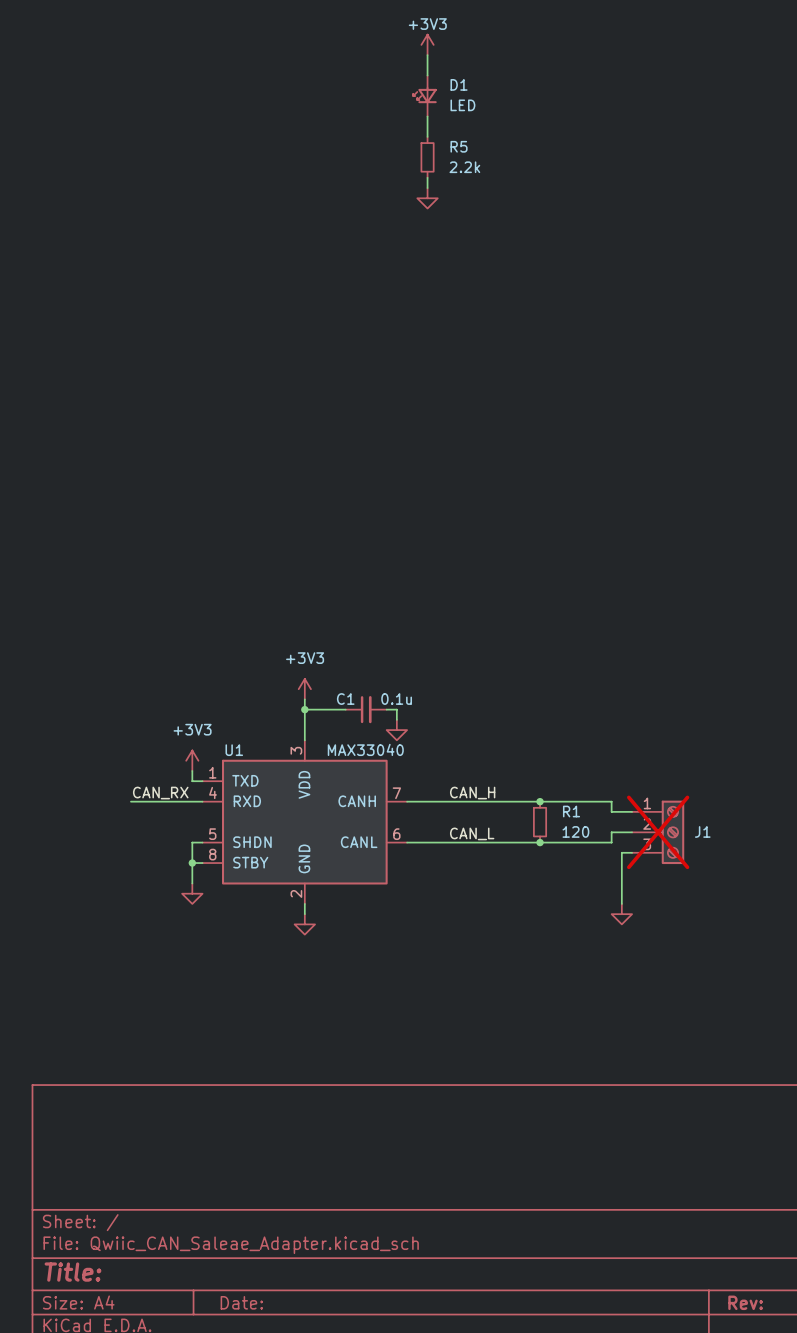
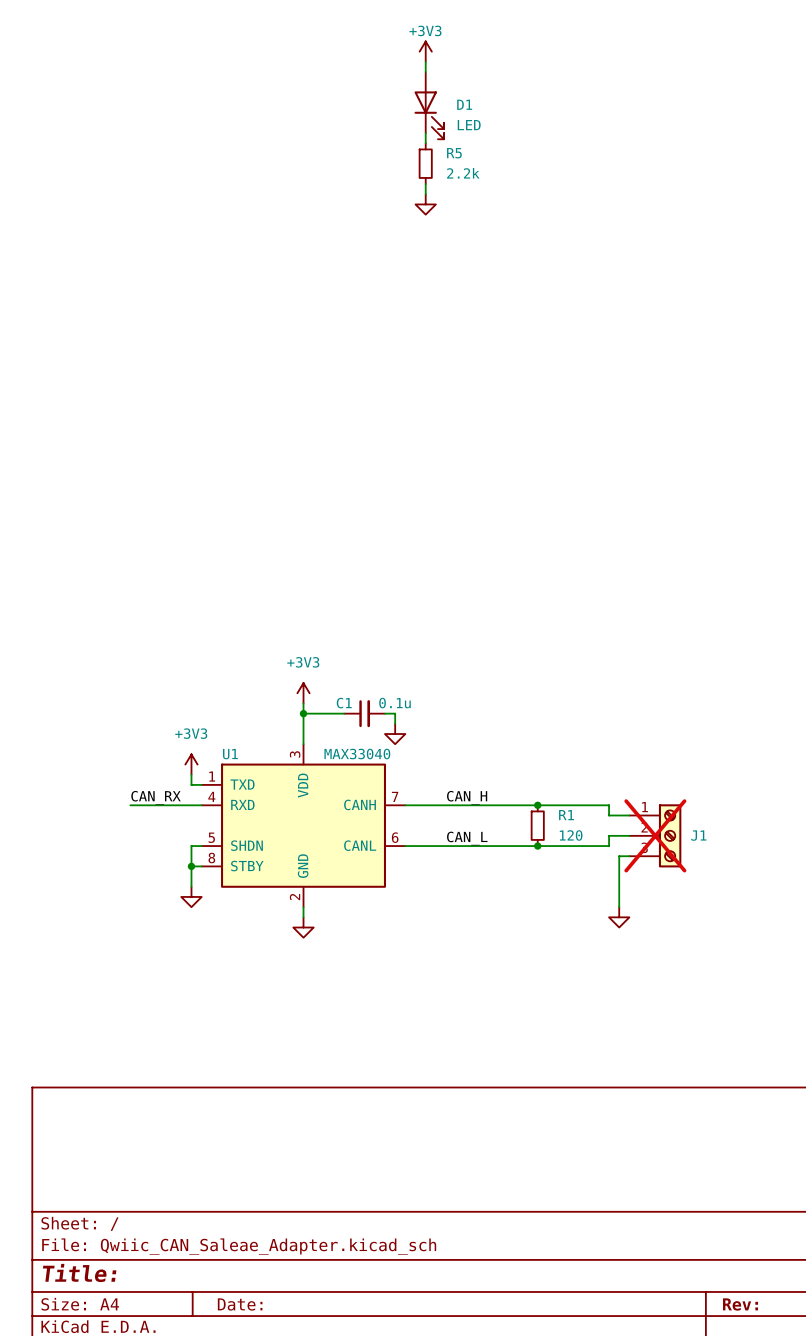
D1 symbol: [413, 75, 437, 117] -> [414, 72, 445, 140]

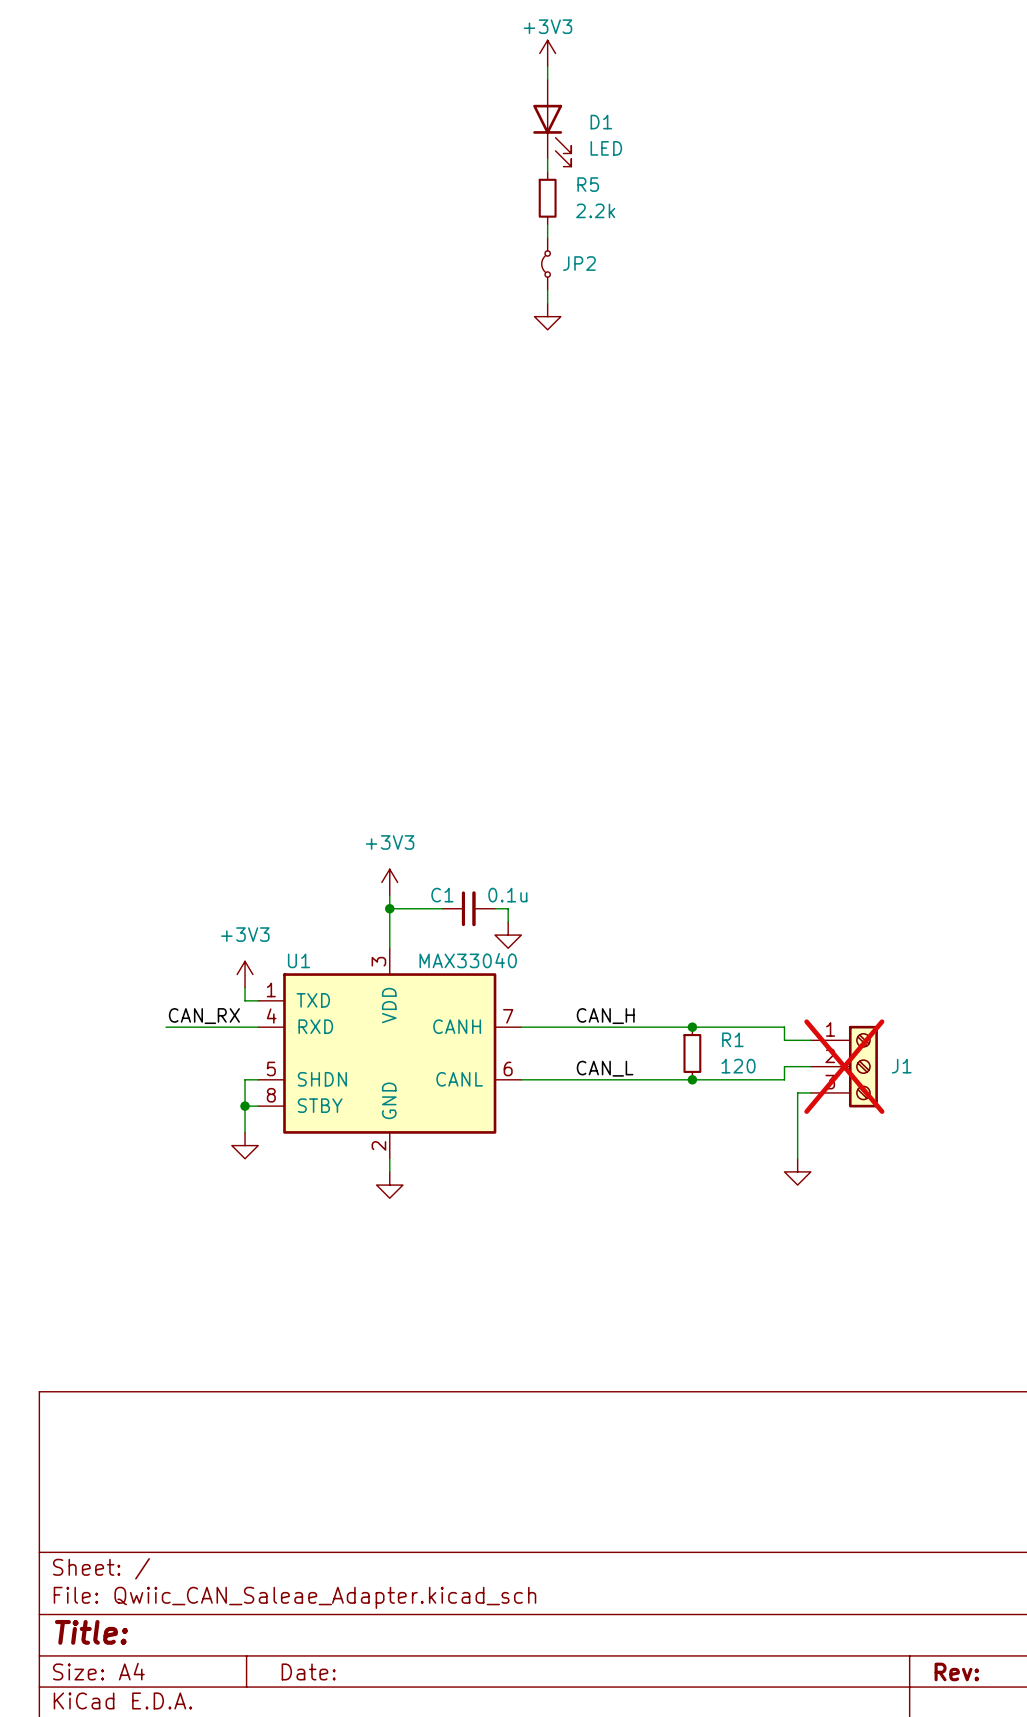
power symbol position: (425, 204) -> (547, 316)
JP2: none -> (546, 264)
wire: none -> (547, 290) (547, 303)

